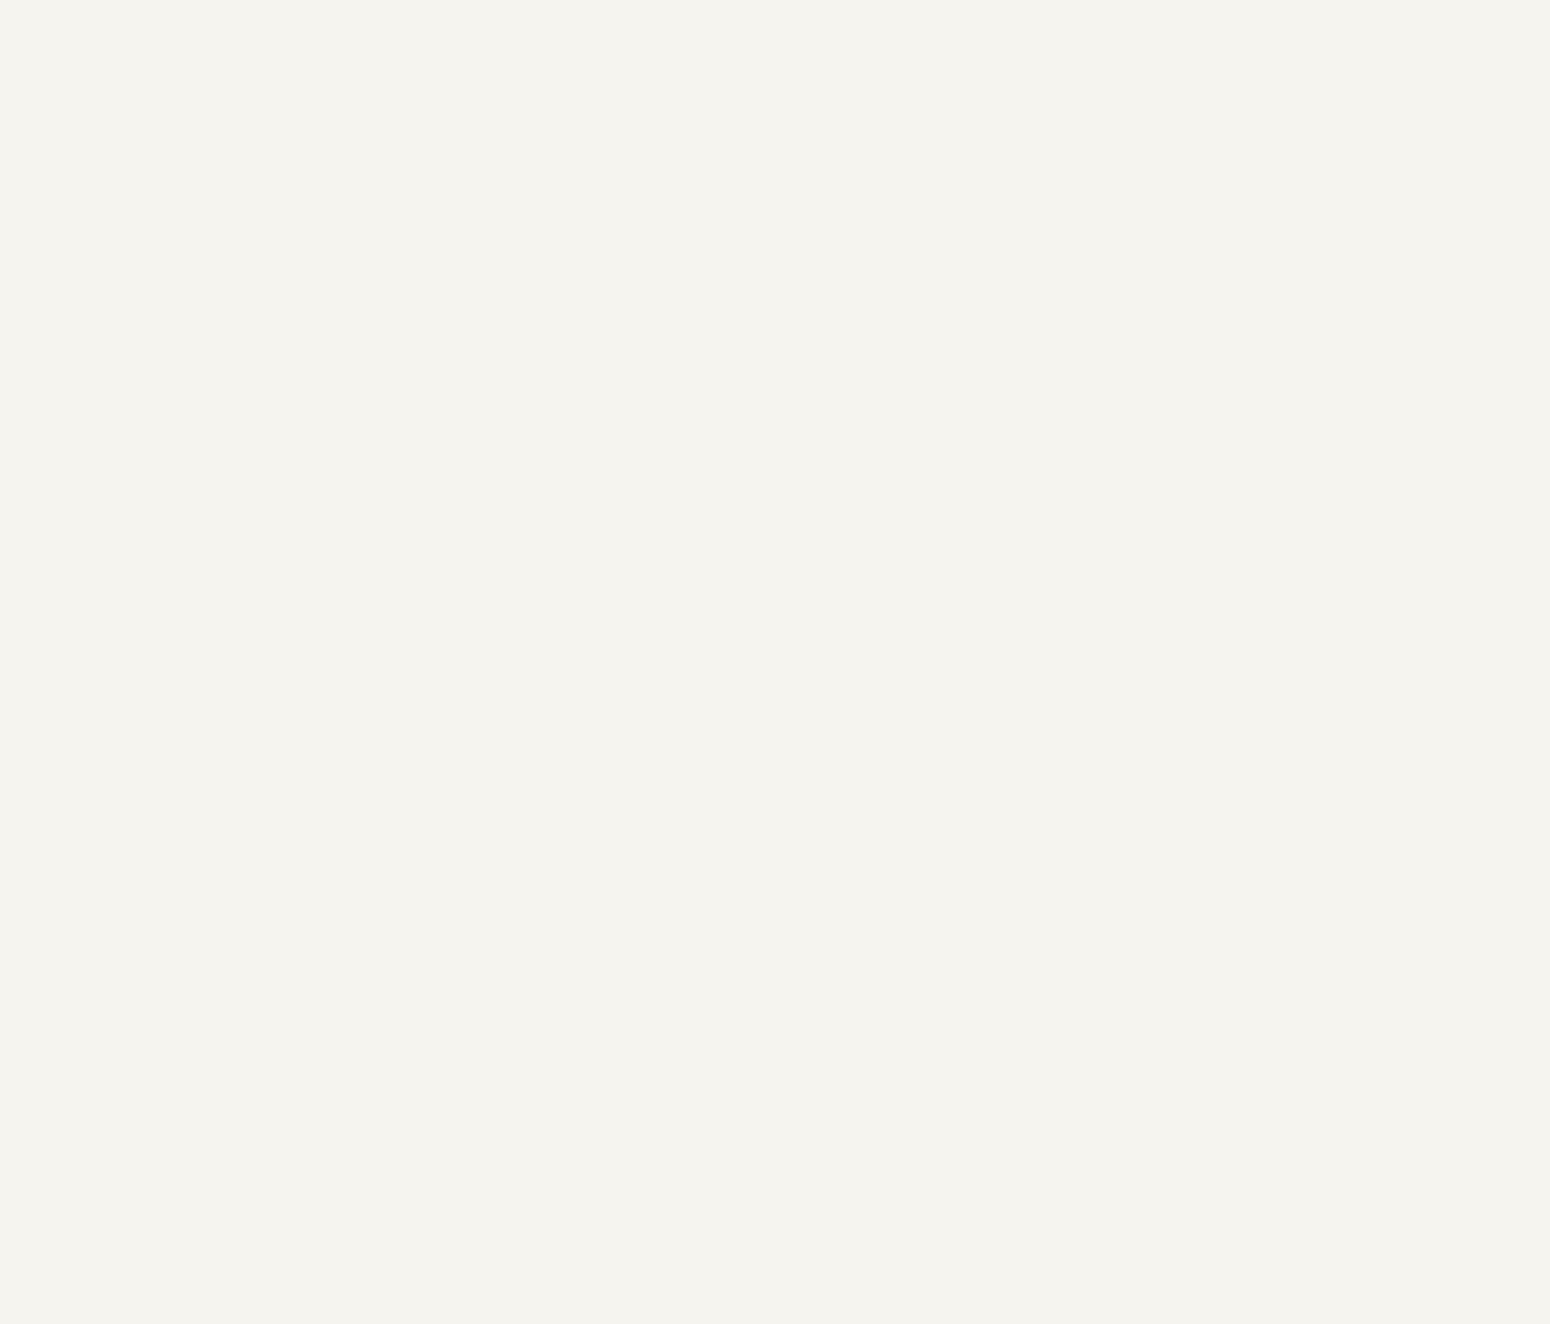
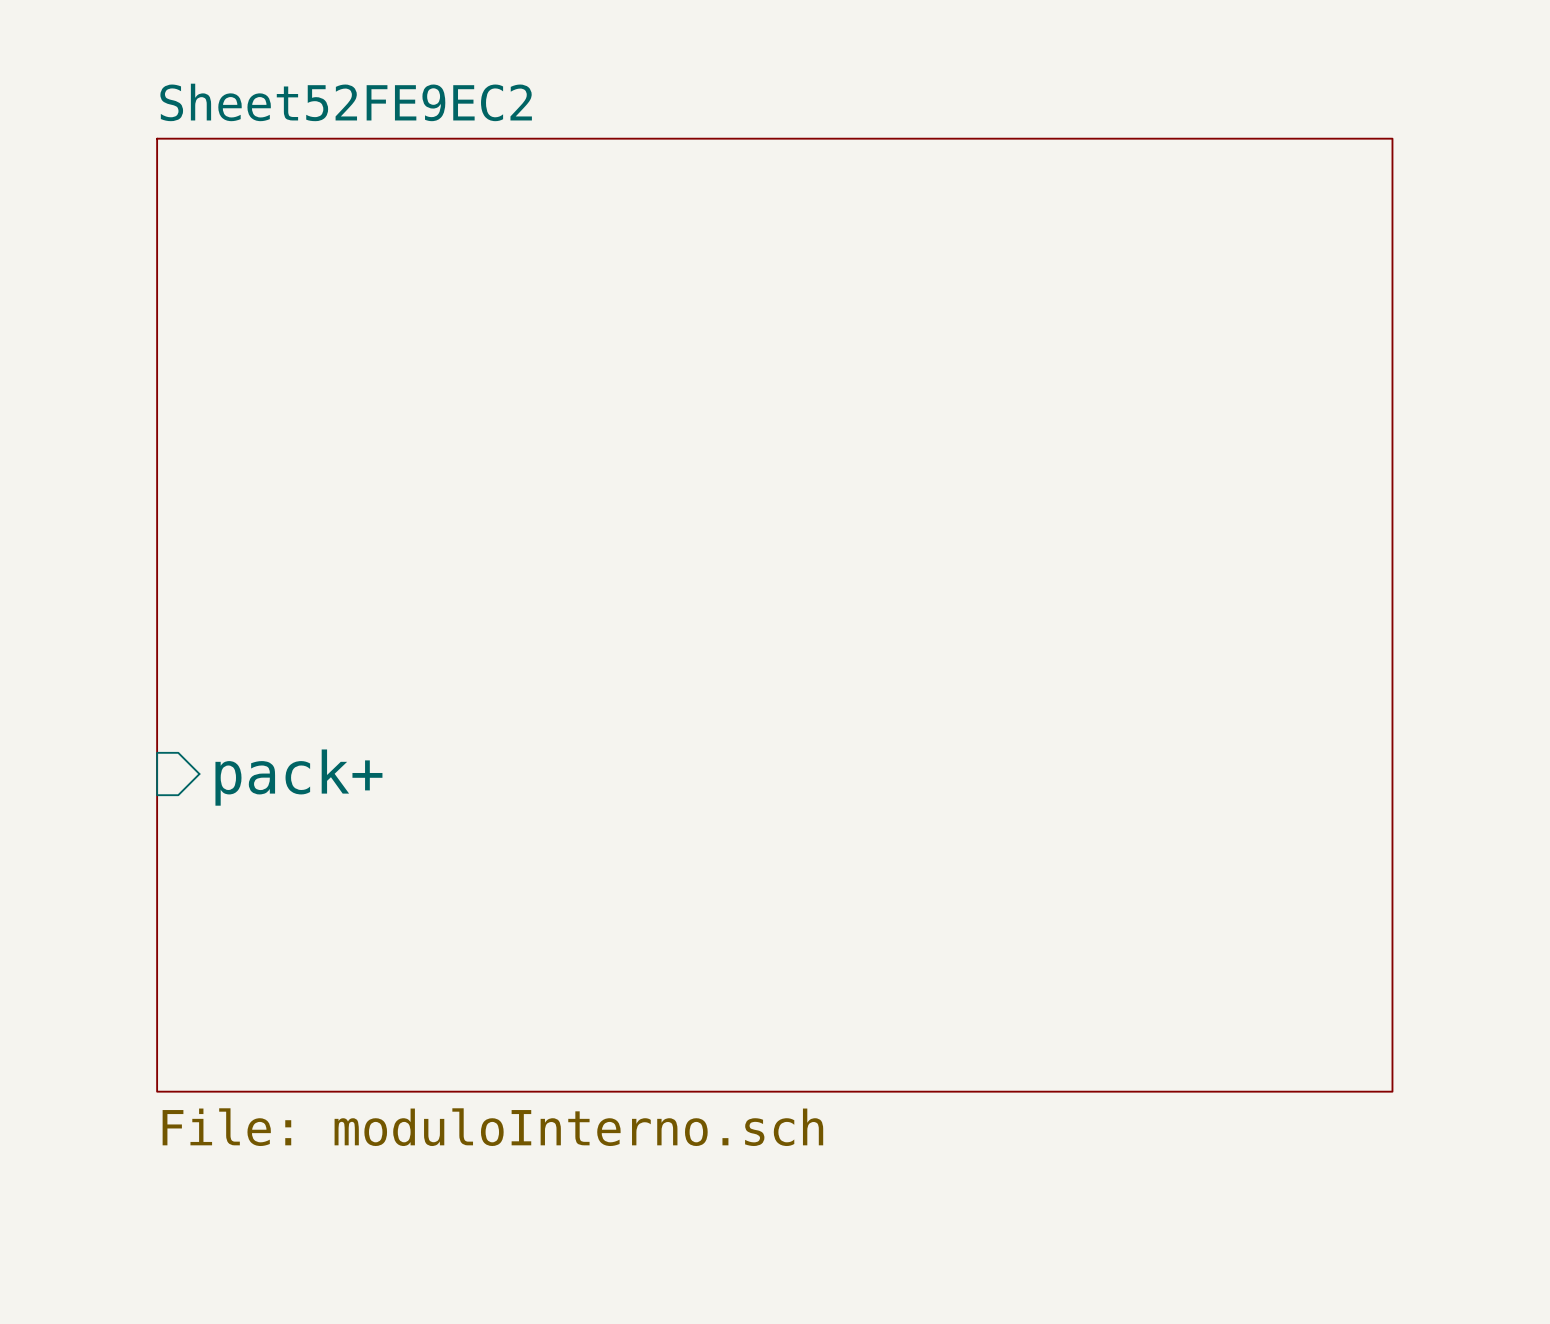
sheet Sheet52FE9EC2: none -> File: moduloInterno.sch (774, 615)
sheet pin: none -> pack+ (298, 777)

